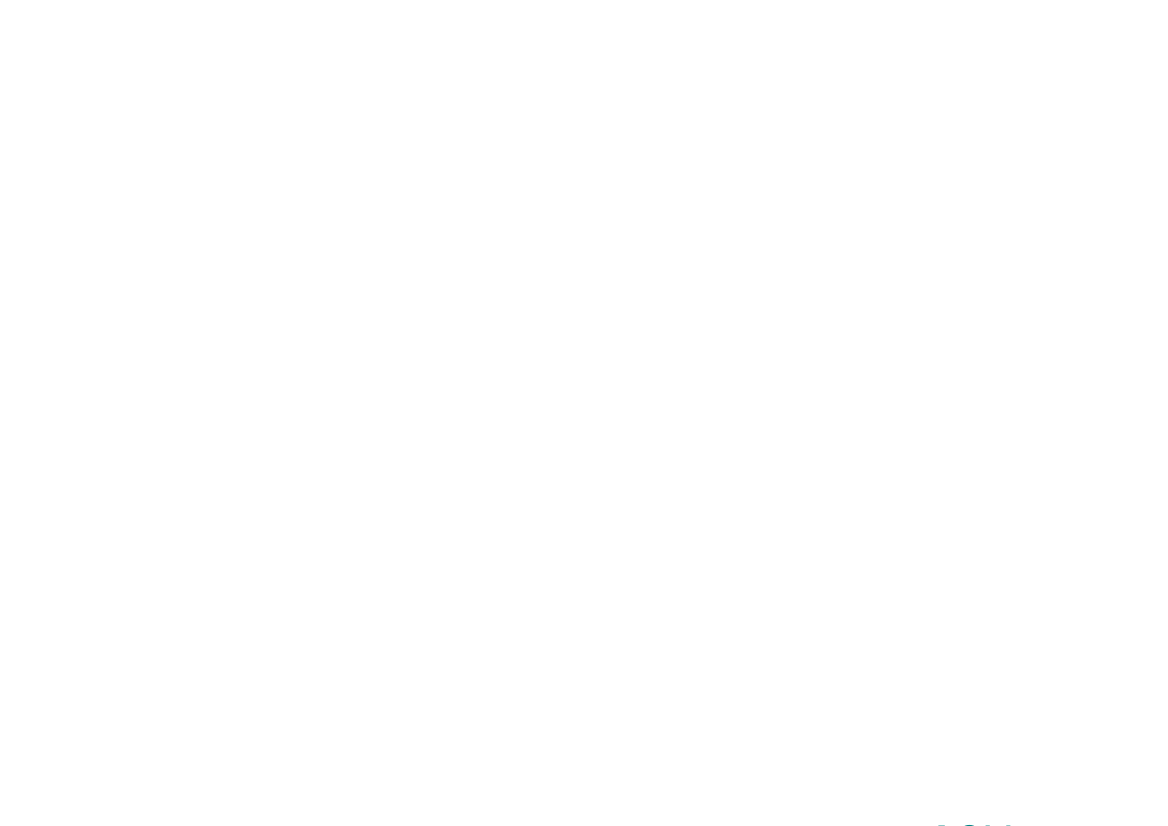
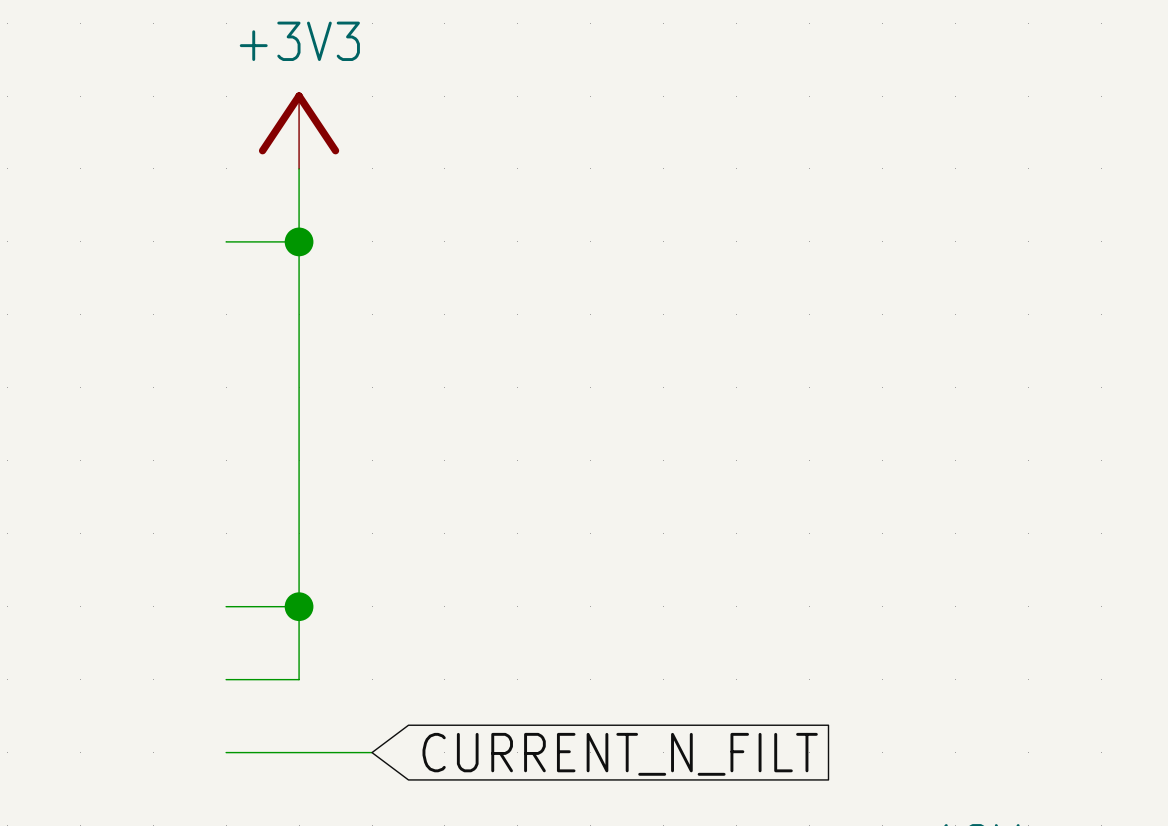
power symbol: none -> +3V3 (299, 130)
wire: none -> (299, 168) (299, 679) (226, 679)
wire: none -> (226, 241) (299, 241)
junction: none -> (299, 241)
wire: none -> (226, 606) (299, 606)
junction: none -> (299, 606)
wire: none -> (226, 752) (372, 752)
global label: none -> CURRENT_N_FILT (620, 754)

